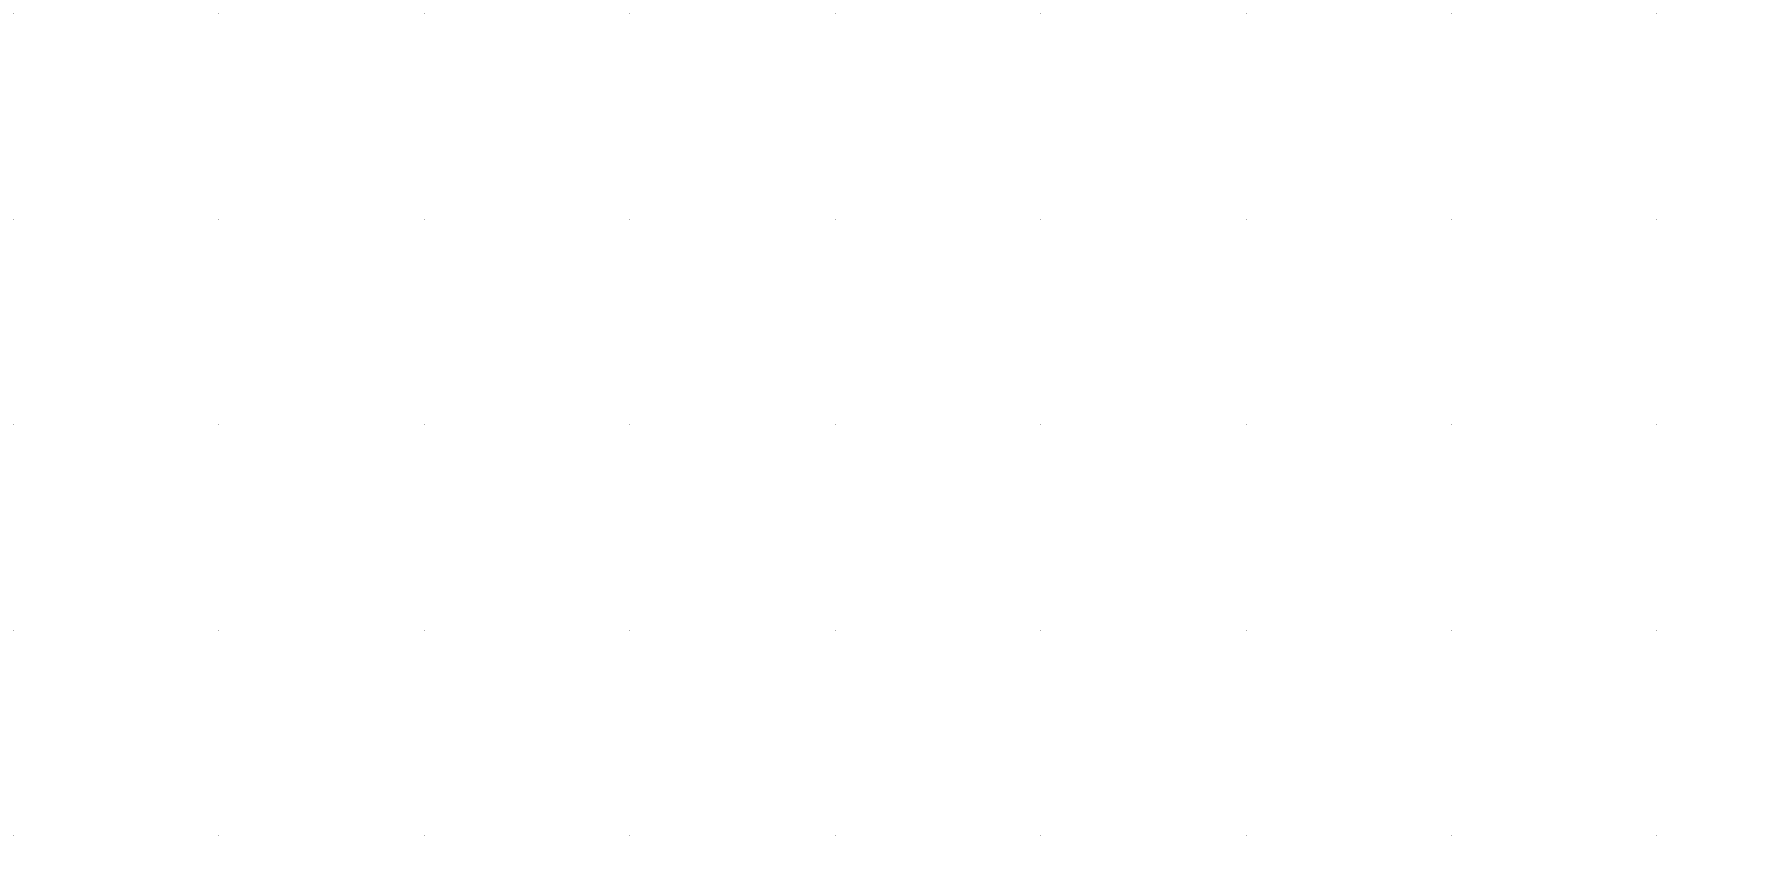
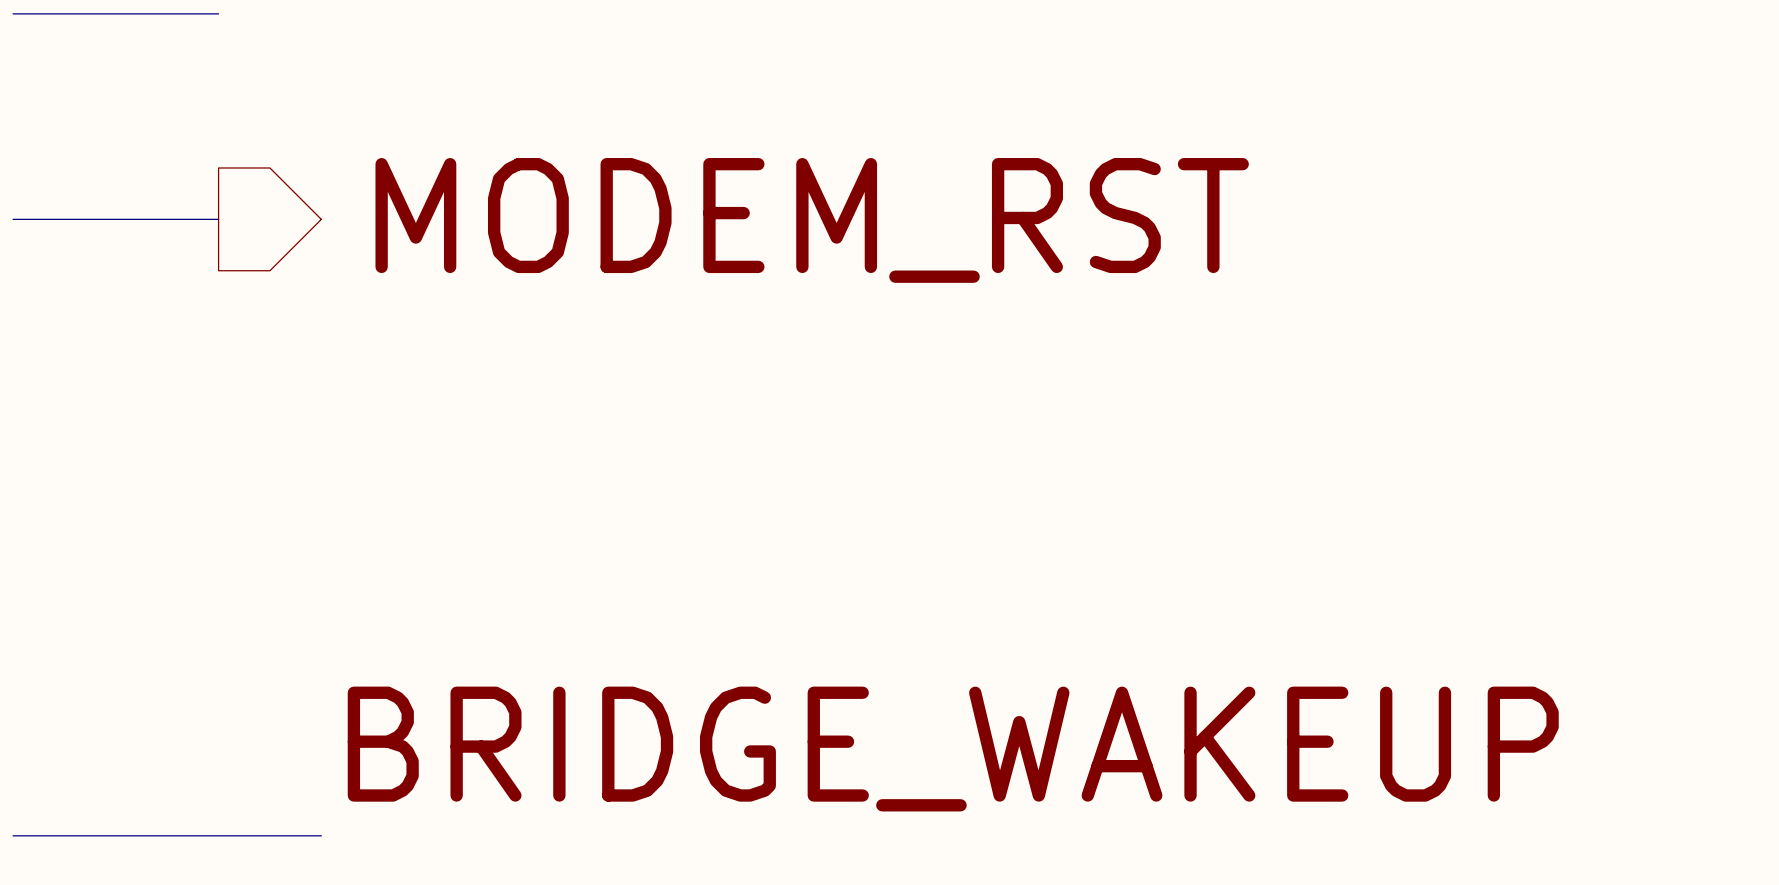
wire: none -> (13, 13) (218, 13)
wire: none -> (13, 219) (218, 219)
hierarchical label: none -> MODEM_RST (812, 220)
label: none -> BRIDGE_WAKEUP (953, 749)
wire: none -> (13, 835) (321, 835)

